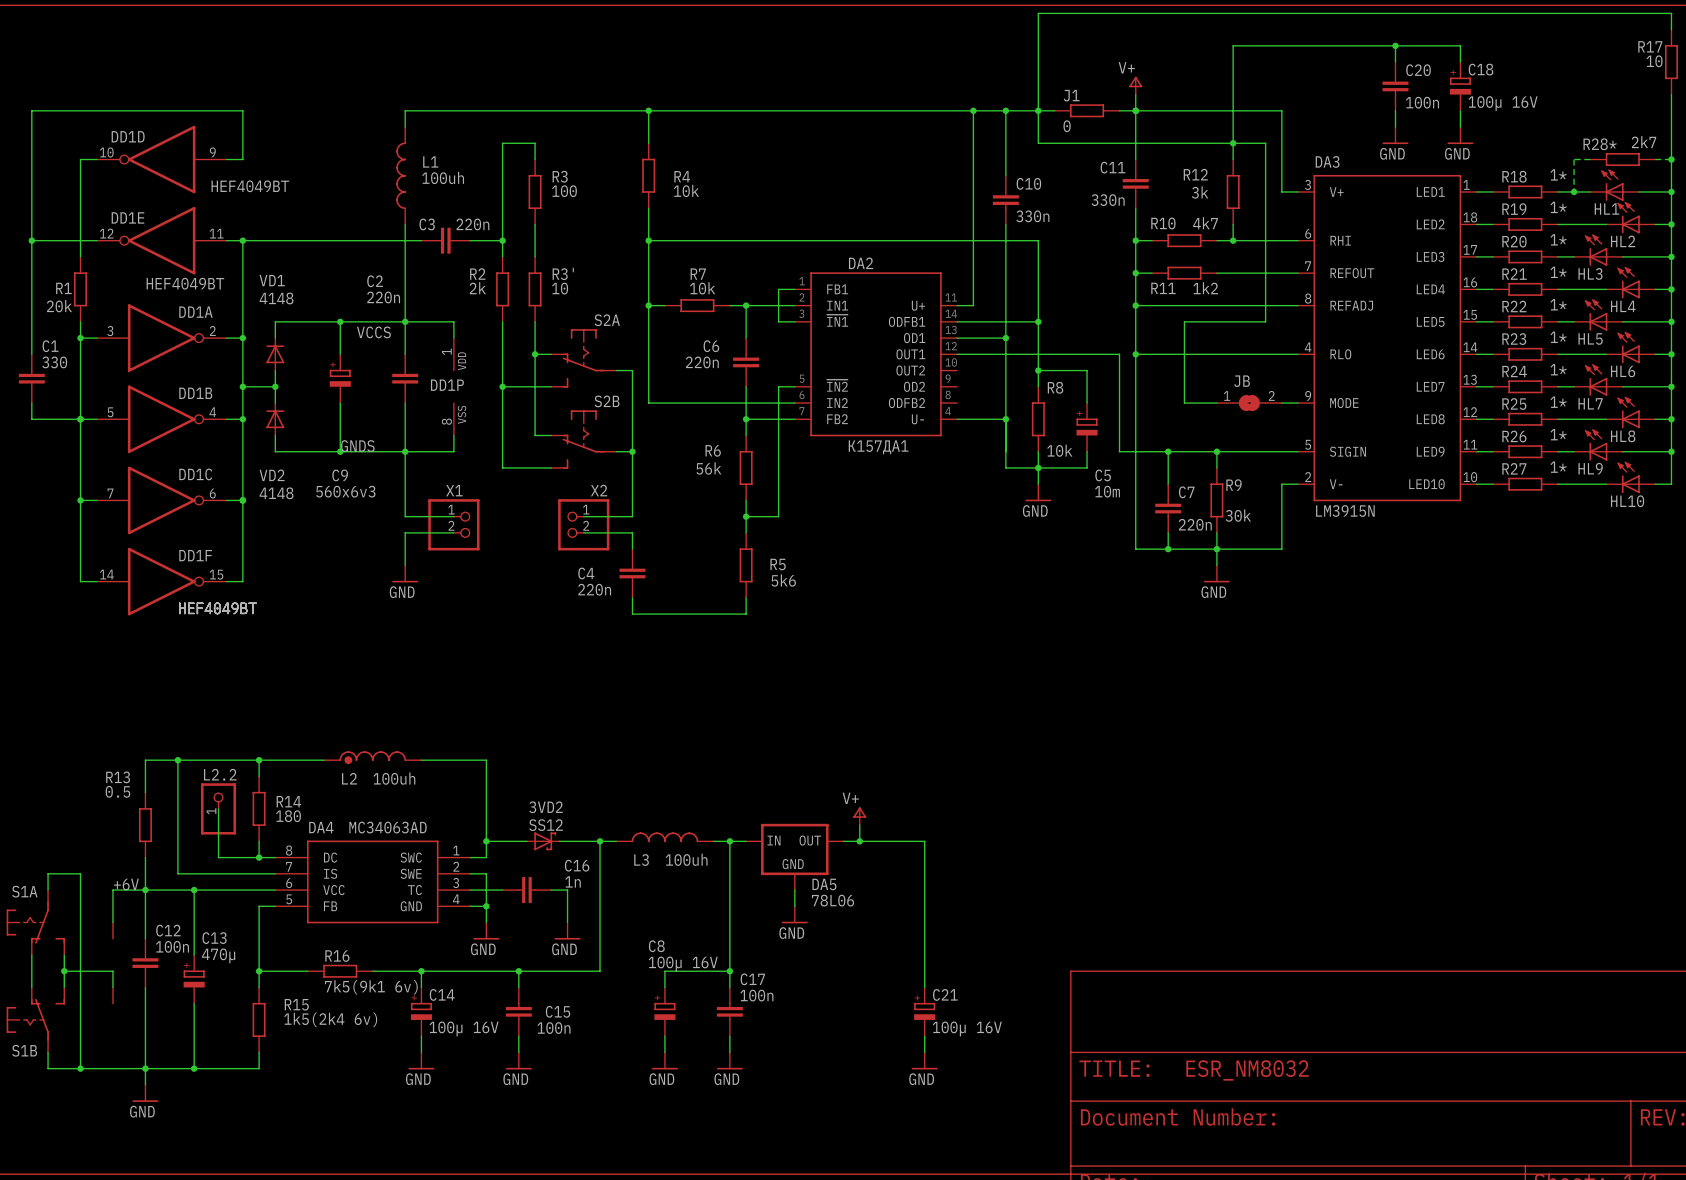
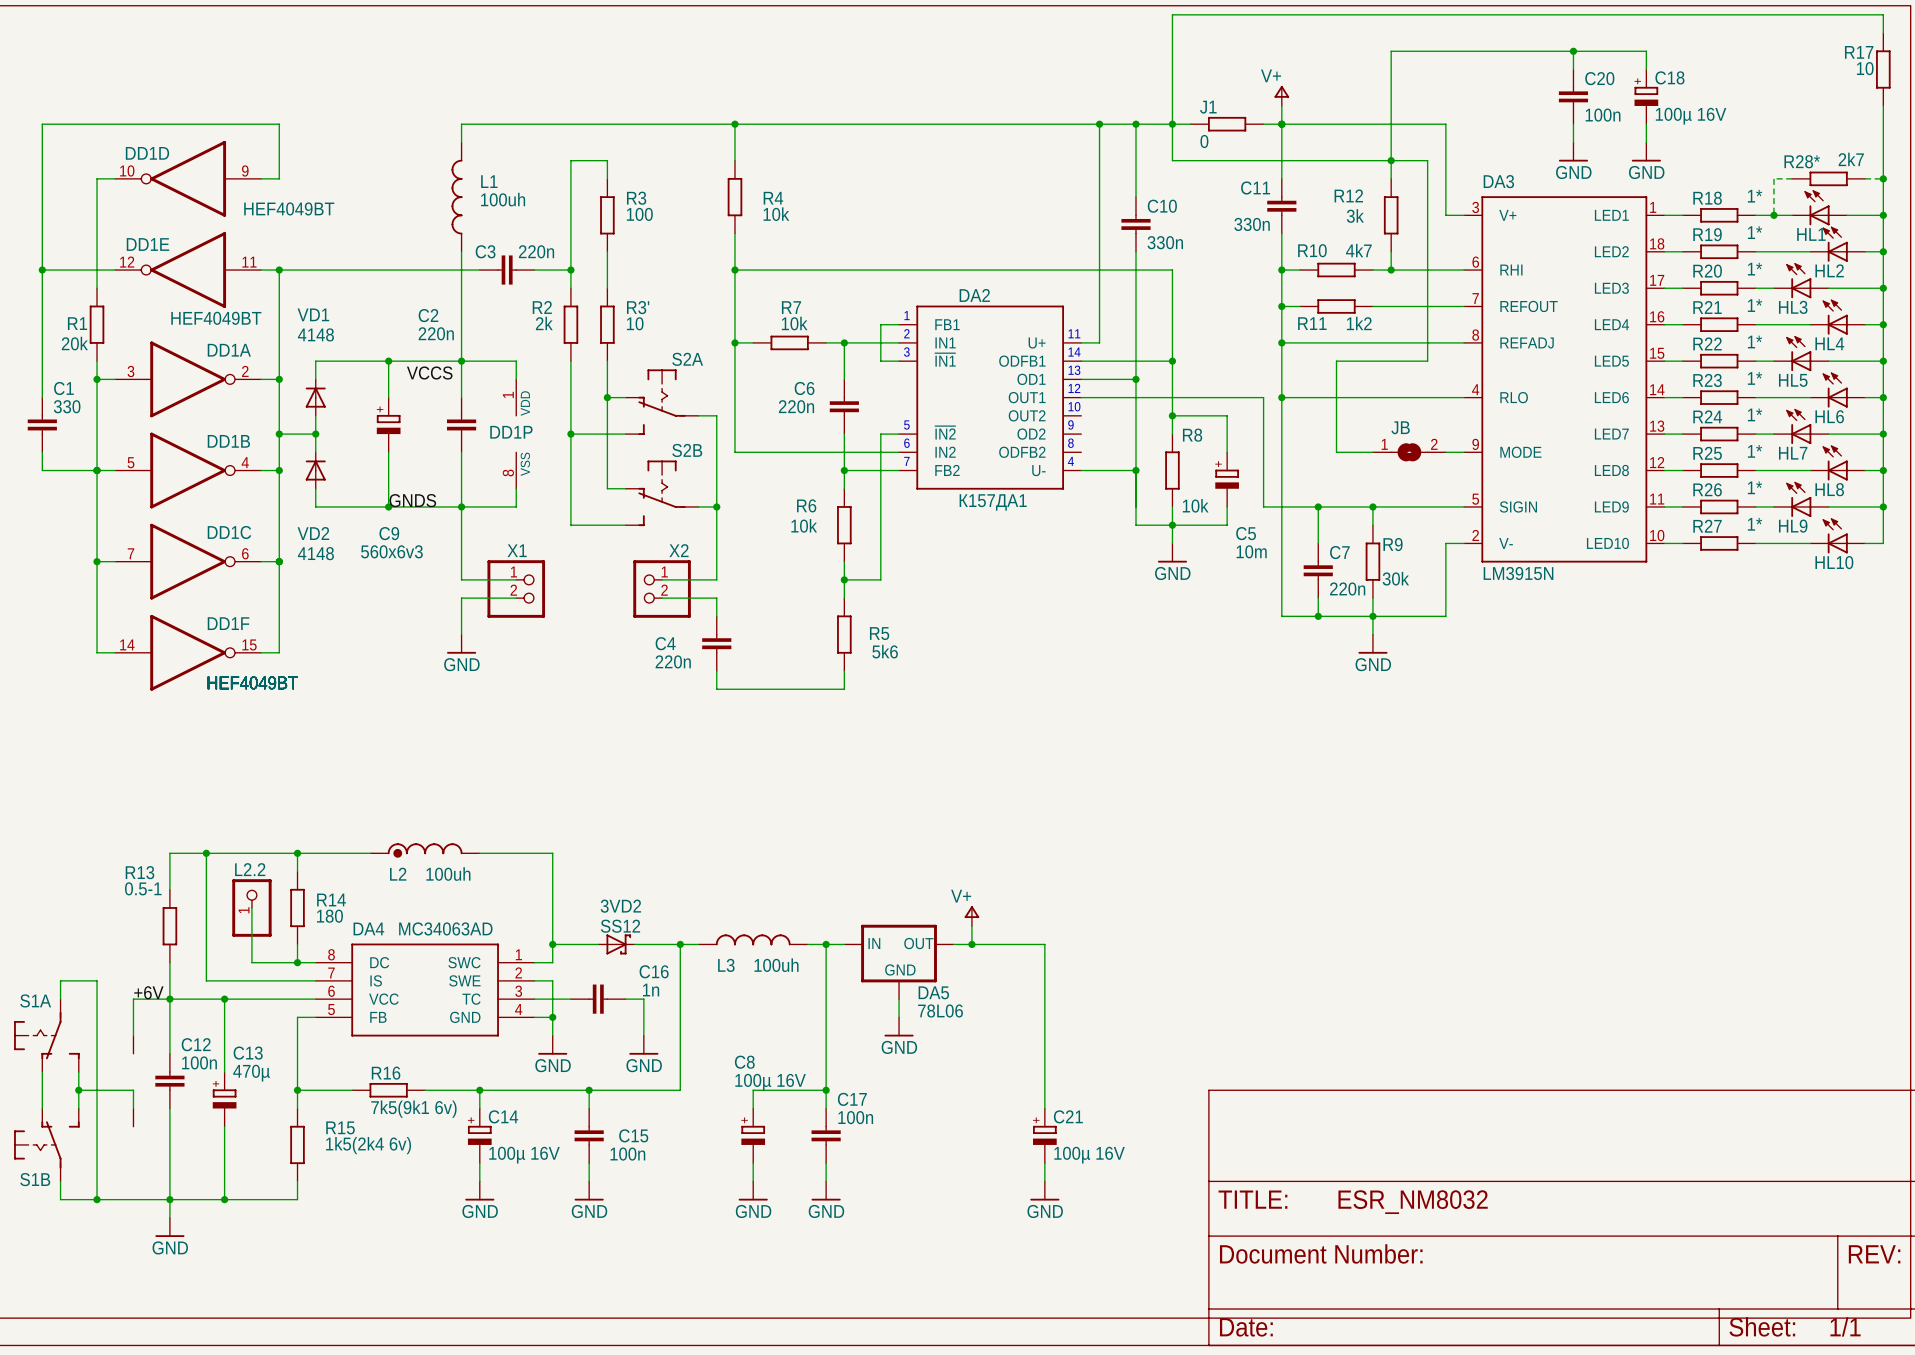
R6 value: 56k (708, 468) -> 10k (804, 525)
R13 value: 0.5 (117, 791) -> 0.5-1 (143, 888)

